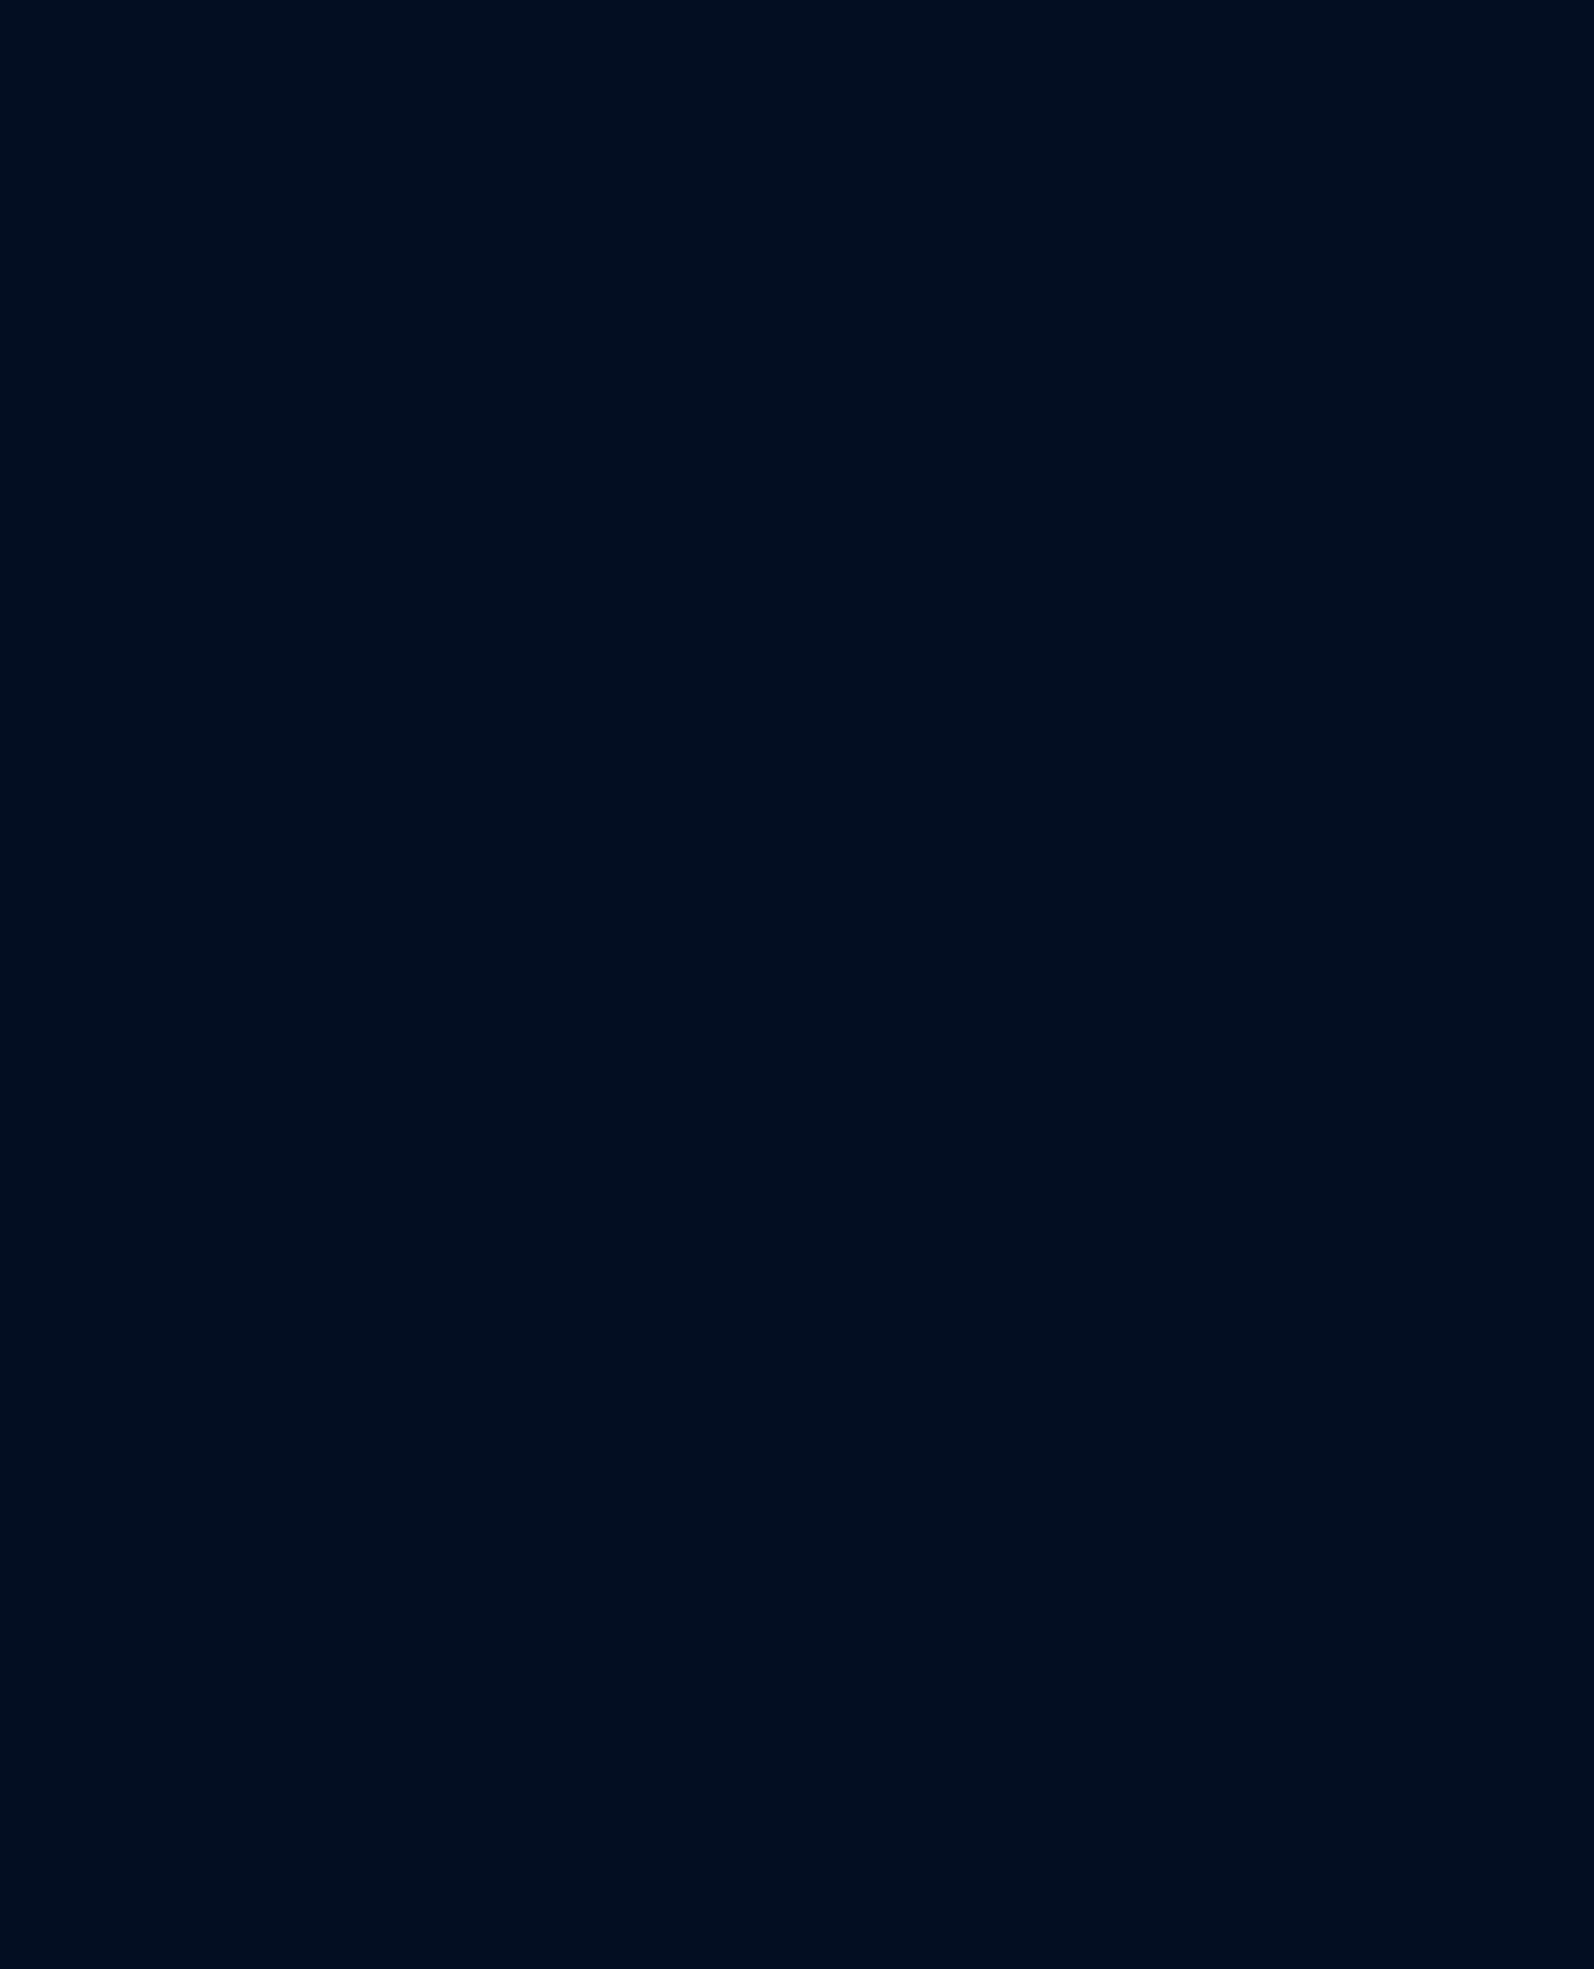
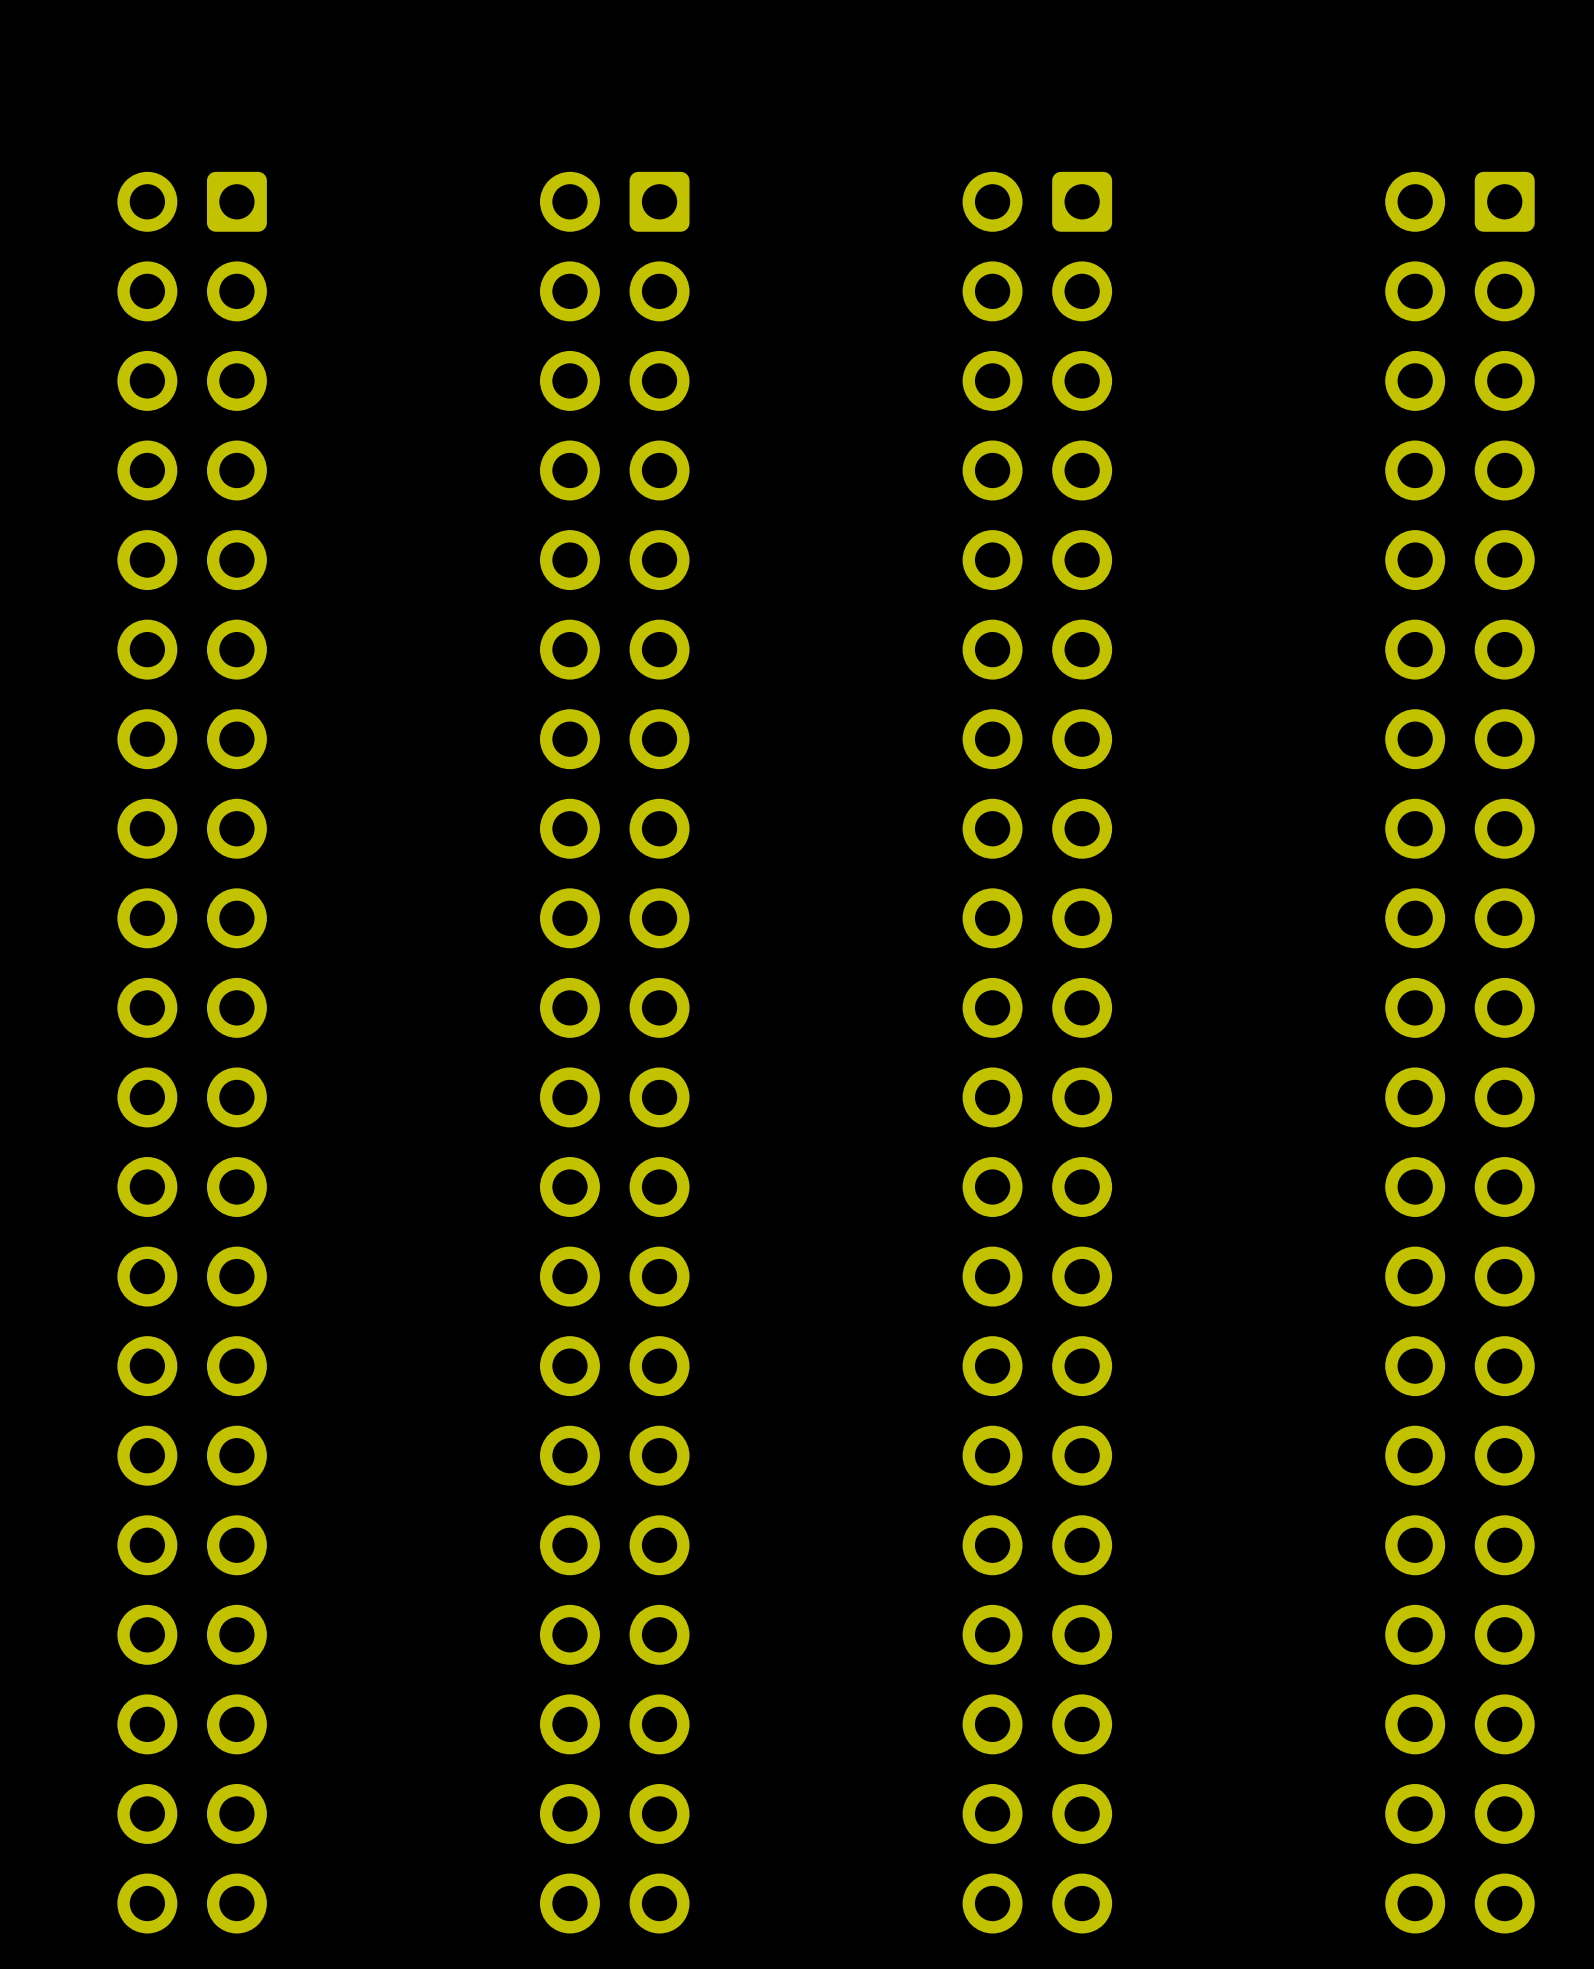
part: none -> (192, 1052)
part: none -> (614, 1052)
part: none -> (1037, 1052)
part: none -> (1459, 1052)

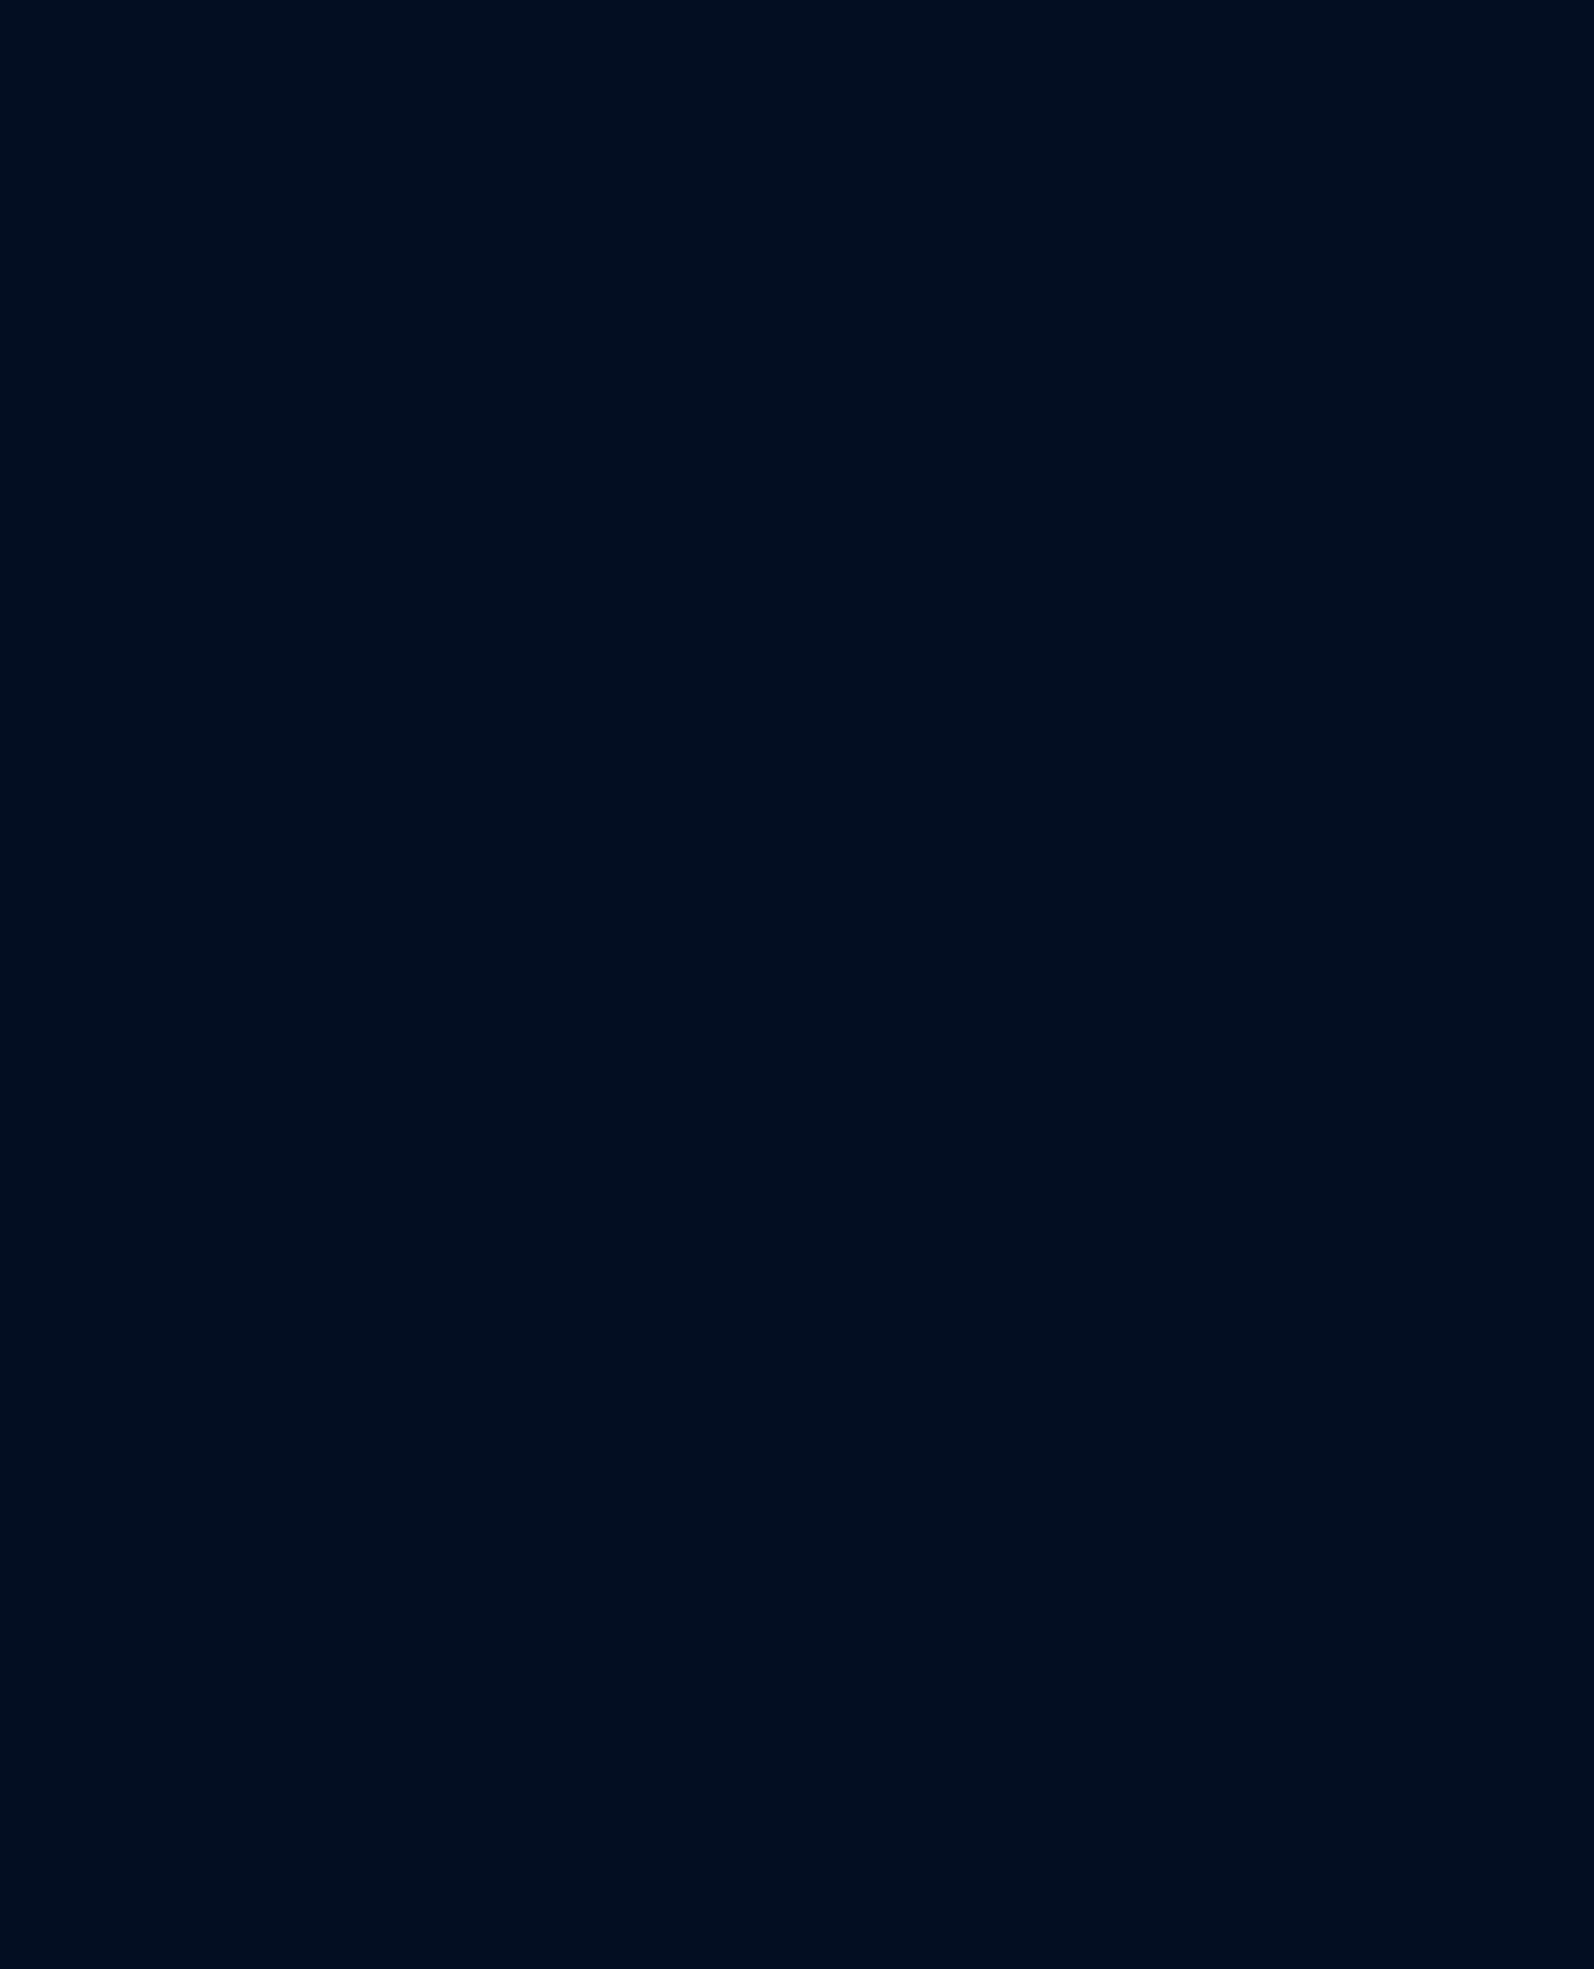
part: (192, 1052) -> none
part: (614, 1052) -> none
part: (1037, 1052) -> none
part: (1459, 1052) -> none

